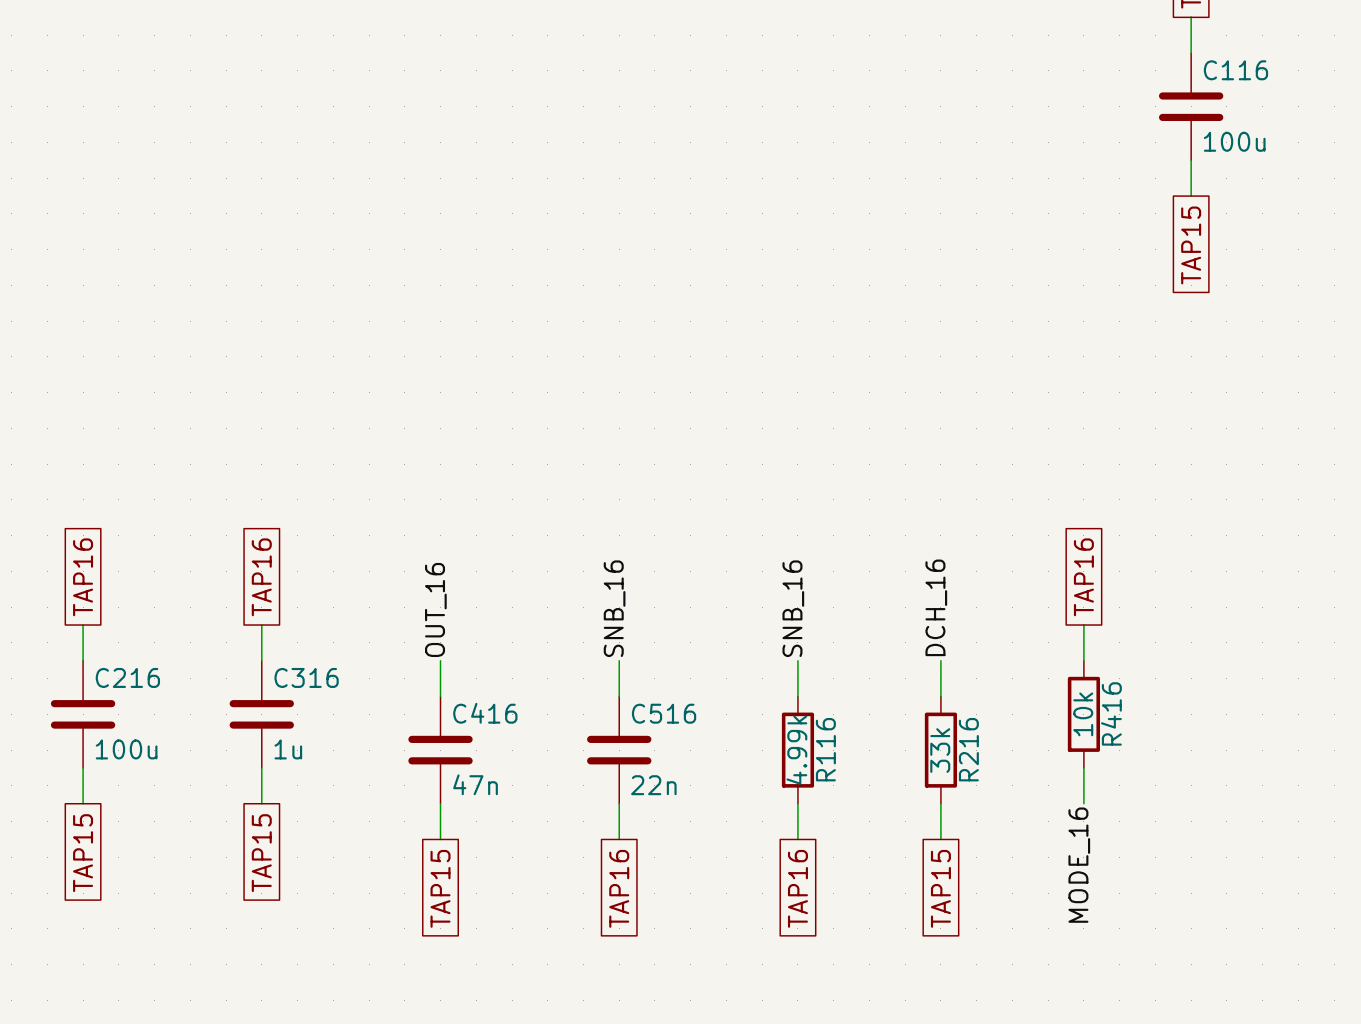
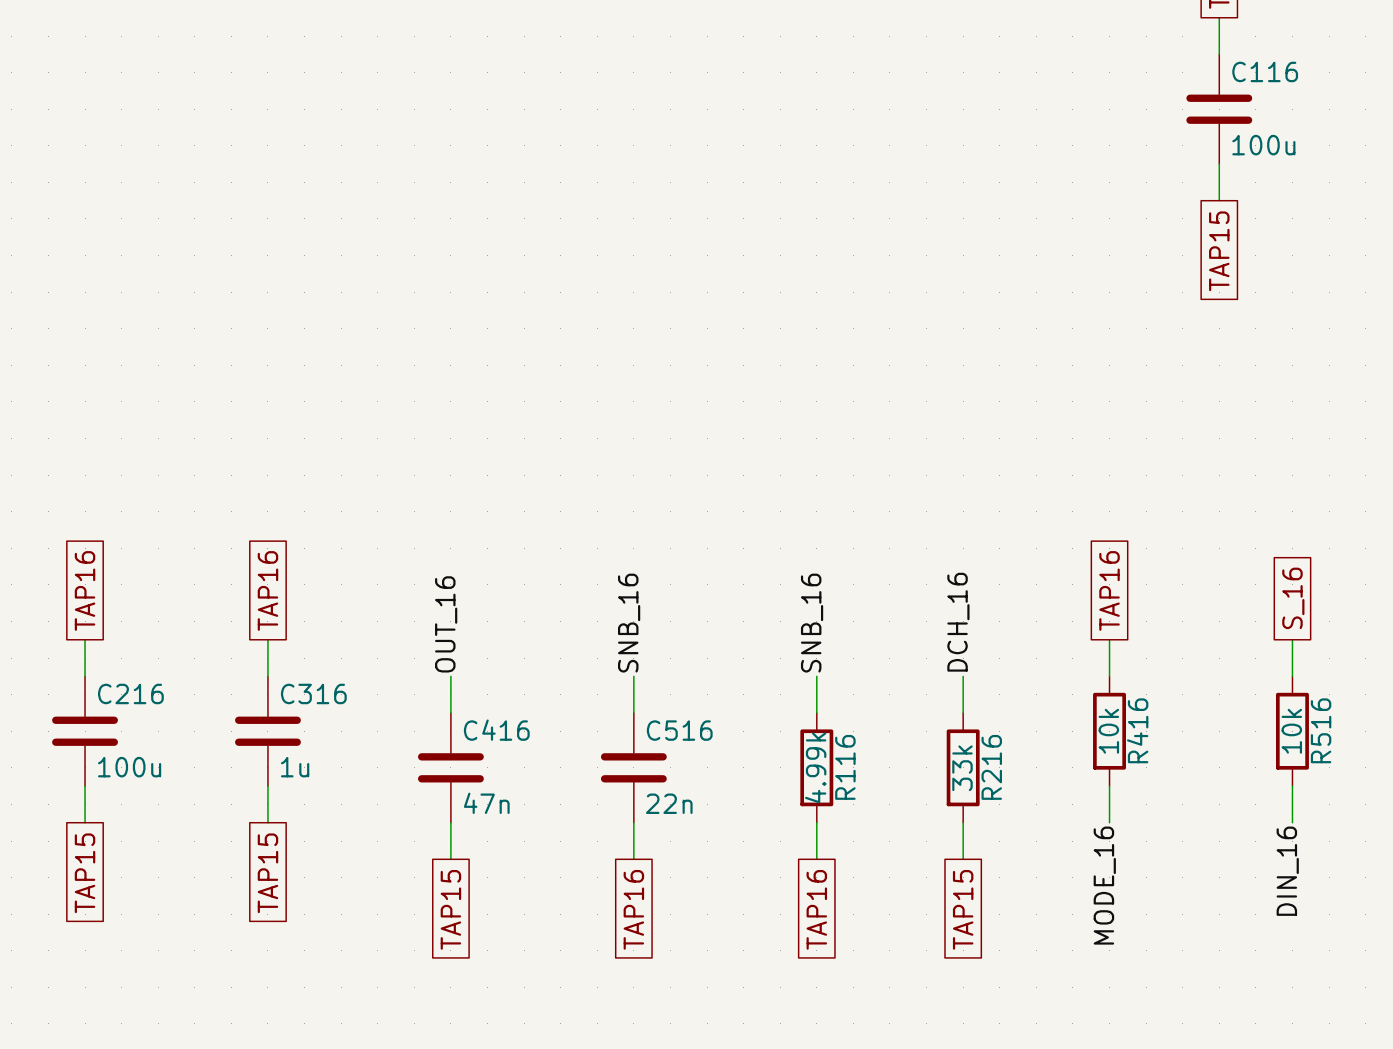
global label: none -> S_16 (1293, 598)
wire: none -> (1292, 639) (1292, 676)
R516: none -> 10k (1292, 731)
wire: none -> (1292, 786) (1292, 822)
label: none -> DIN_16 (1287, 871)

